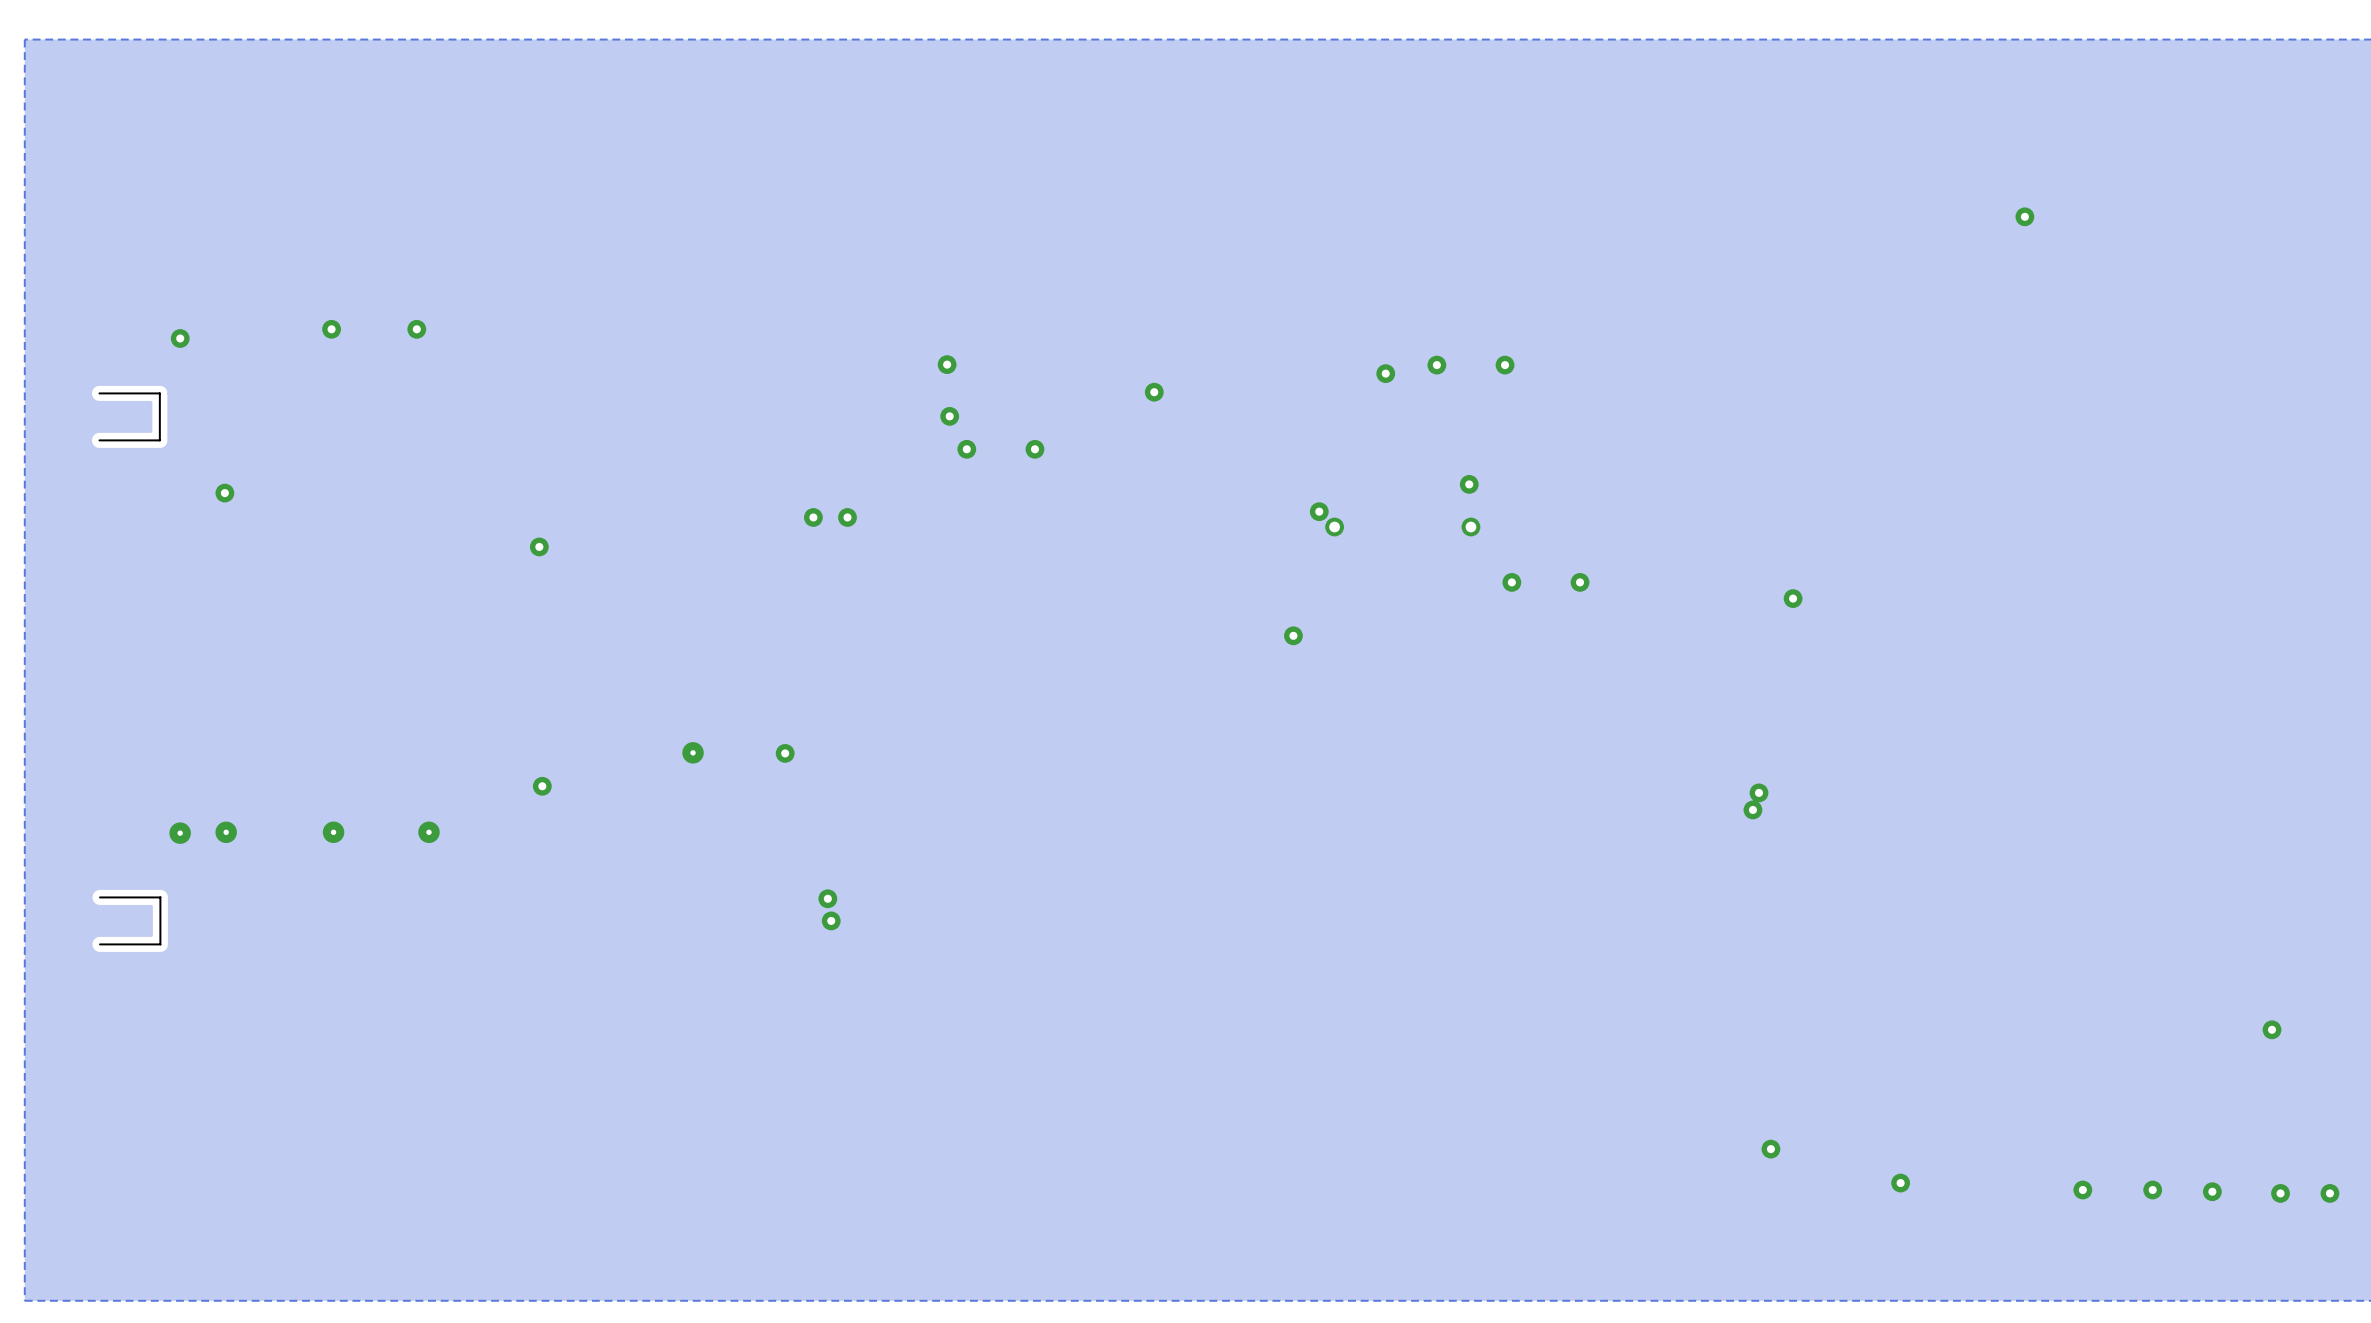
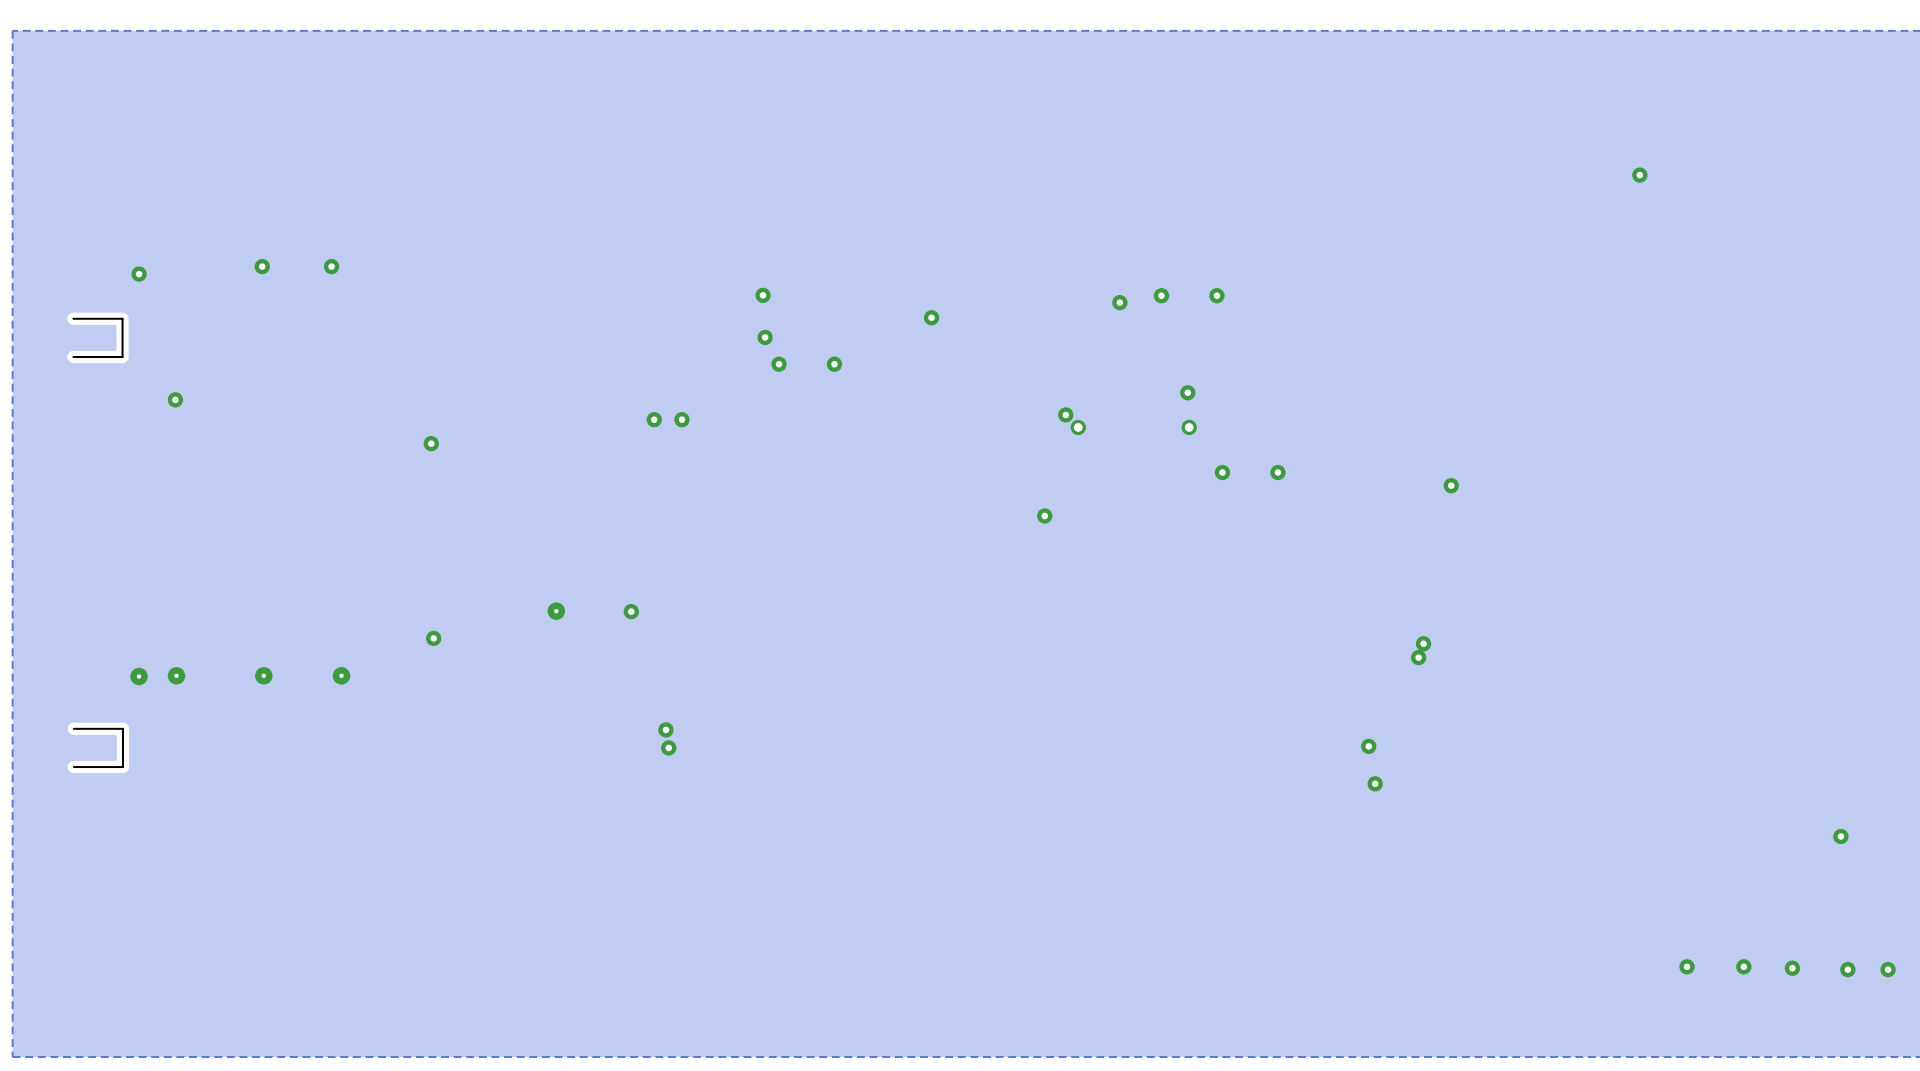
via: none -> (1368, 746)
via: none -> (1375, 783)
via: (1770, 1149) -> none
via: (1900, 1183) -> none

